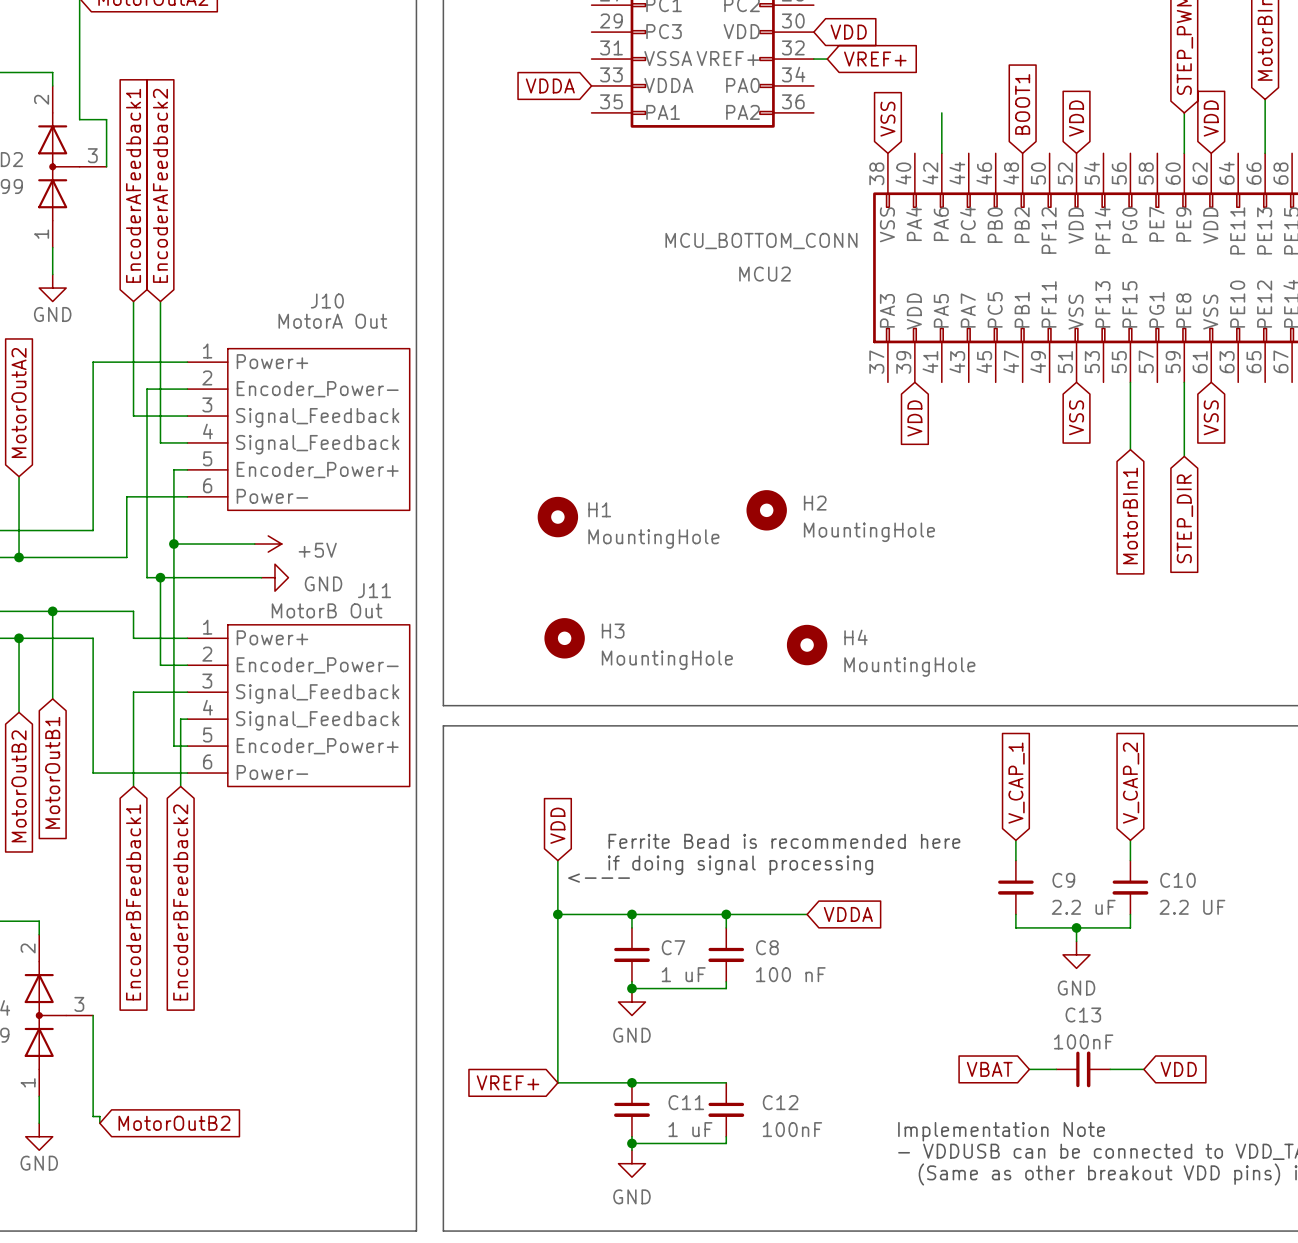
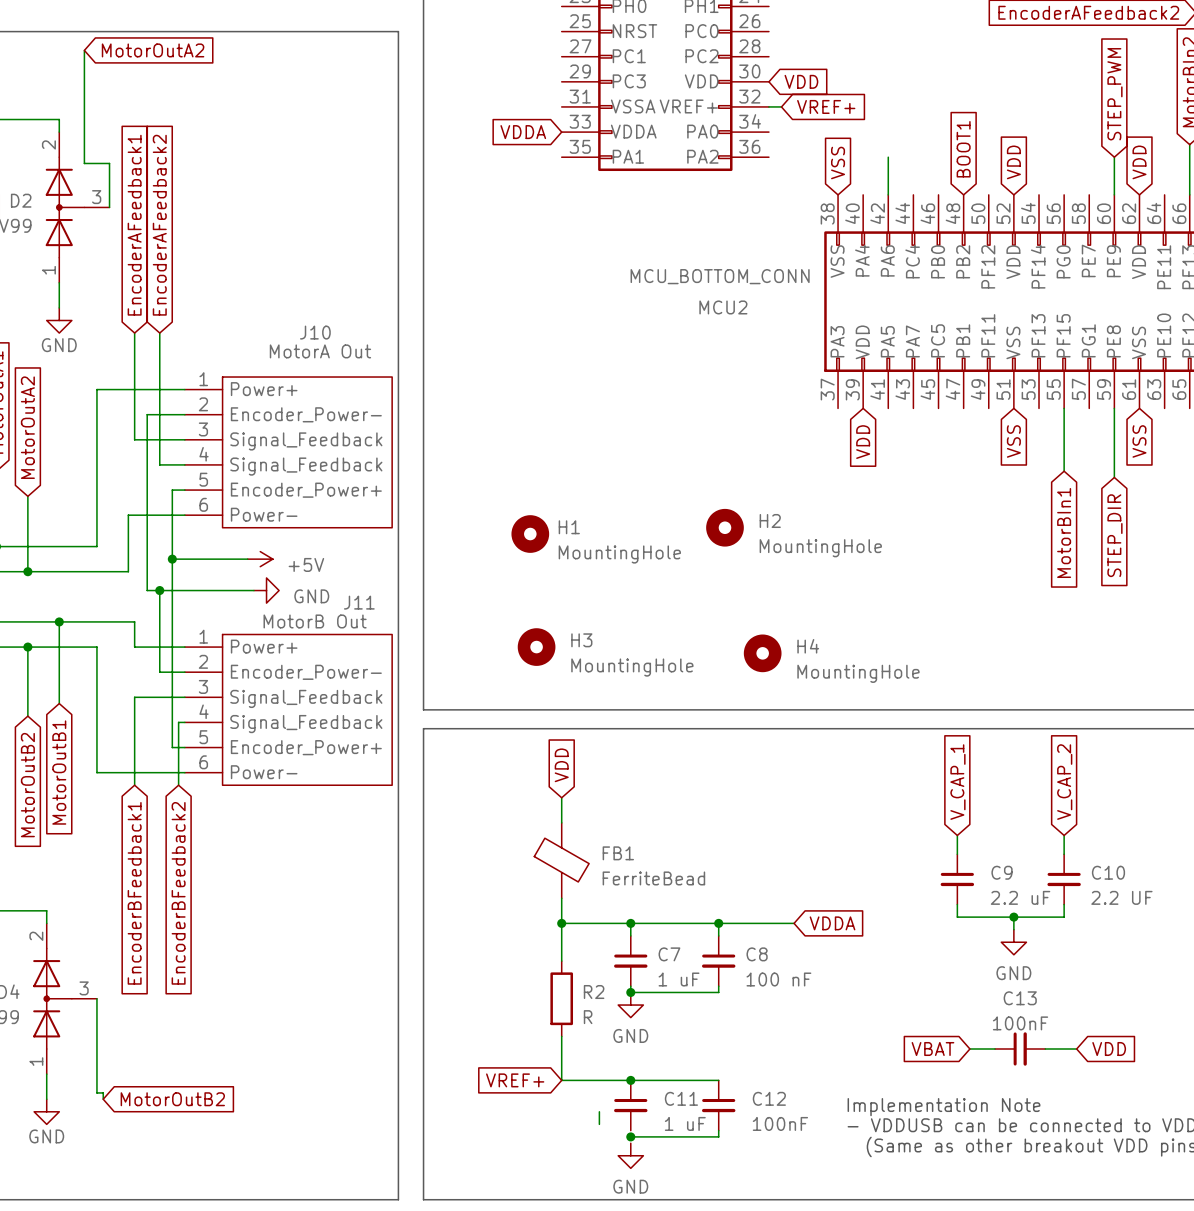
wire: none -> (561, 797) (561, 822)
global label position: VDD (557, 825) -> VDD (561, 765)
text: Ferrite Bead is recommended here (784, 841) -> none
wire: (557, 860) (557, 1082) (726, 1082) -> none
text: if doing signal processing (740, 865) -> none
FB1: none -> FerriteBead (561, 860)
text: <--- (599, 878) -> none
wire: none -> (561, 898) (561, 961)
wire: (557, 914) (807, 914) -> (561, 923) (794, 923)
junction: (557, 914) -> none
wire: (631, 914) (631, 927) -> (630, 923) (630, 935)
junction: (631, 914) -> none
wire: (726, 914) (726, 927) -> (718, 923) (718, 935)
junction: (726, 914) -> none
global label position: VDDA (848, 914) -> VDDA (832, 923)
junction: none -> (561, 923)
junction: none -> (630, 923)
junction: none -> (718, 923)
C7 position: (631, 954) -> (630, 961)
C8 position: (726, 954) -> (718, 961)
wire: (631, 981) (631, 988) (726, 988) (726, 981) -> (630, 986) (630, 992) (718, 992) (718, 986)
junction: (631, 988) -> none
power symbol position: GND (631, 1002) -> GND (630, 1005)
junction: none -> (630, 992)
R2: none -> R (561, 998)
wire: none -> (561, 1036) (561, 1080) (718, 1080)
global label position: VREF+ (507, 1082) -> VREF+ (515, 1080)
junction: (631, 1082) -> none
junction: none -> (630, 1080)
C11 position: (631, 1109) -> (630, 1105)
C12 position: (726, 1109) -> (718, 1105)
wire: (726, 1136) (726, 1143) (631, 1143) -> (718, 1130) (718, 1136) (630, 1136)
junction: (631, 1143) -> none
power symbol position: GND (631, 1163) -> GND (630, 1155)
junction: none -> (630, 1136)

